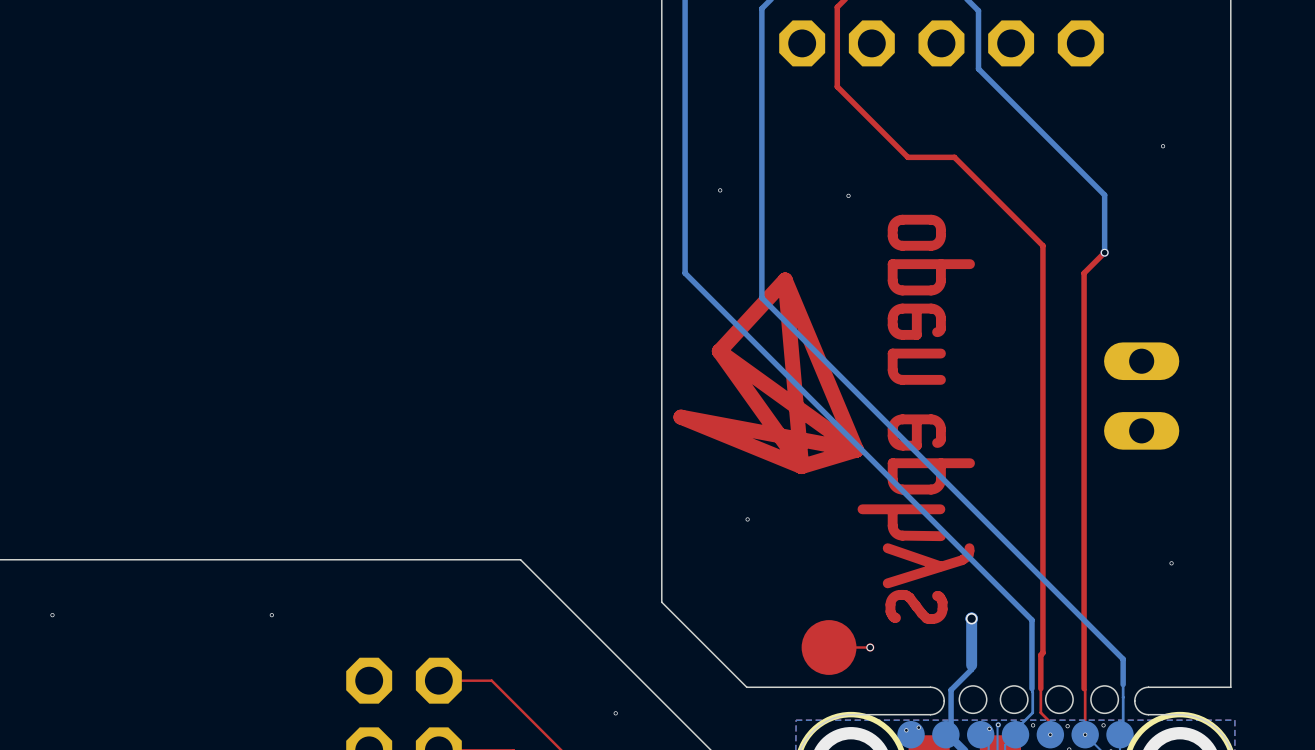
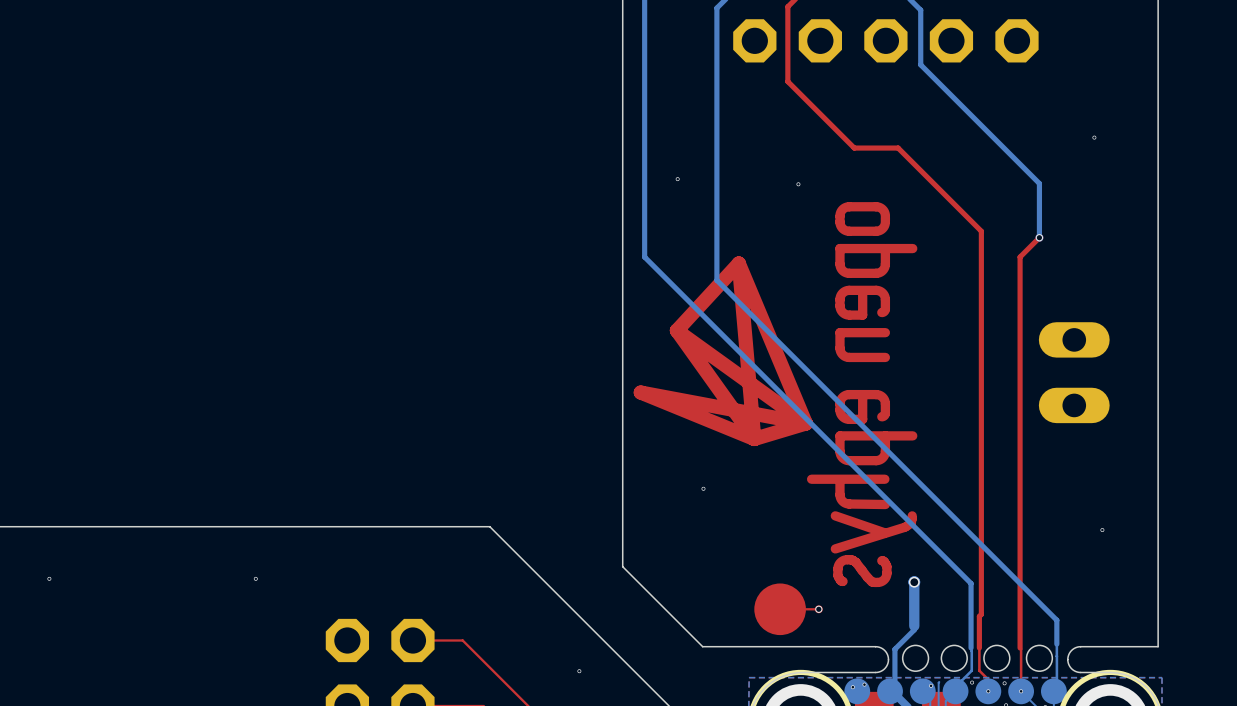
via: (998, 724) -> none
via: (1103, 725) -> none

